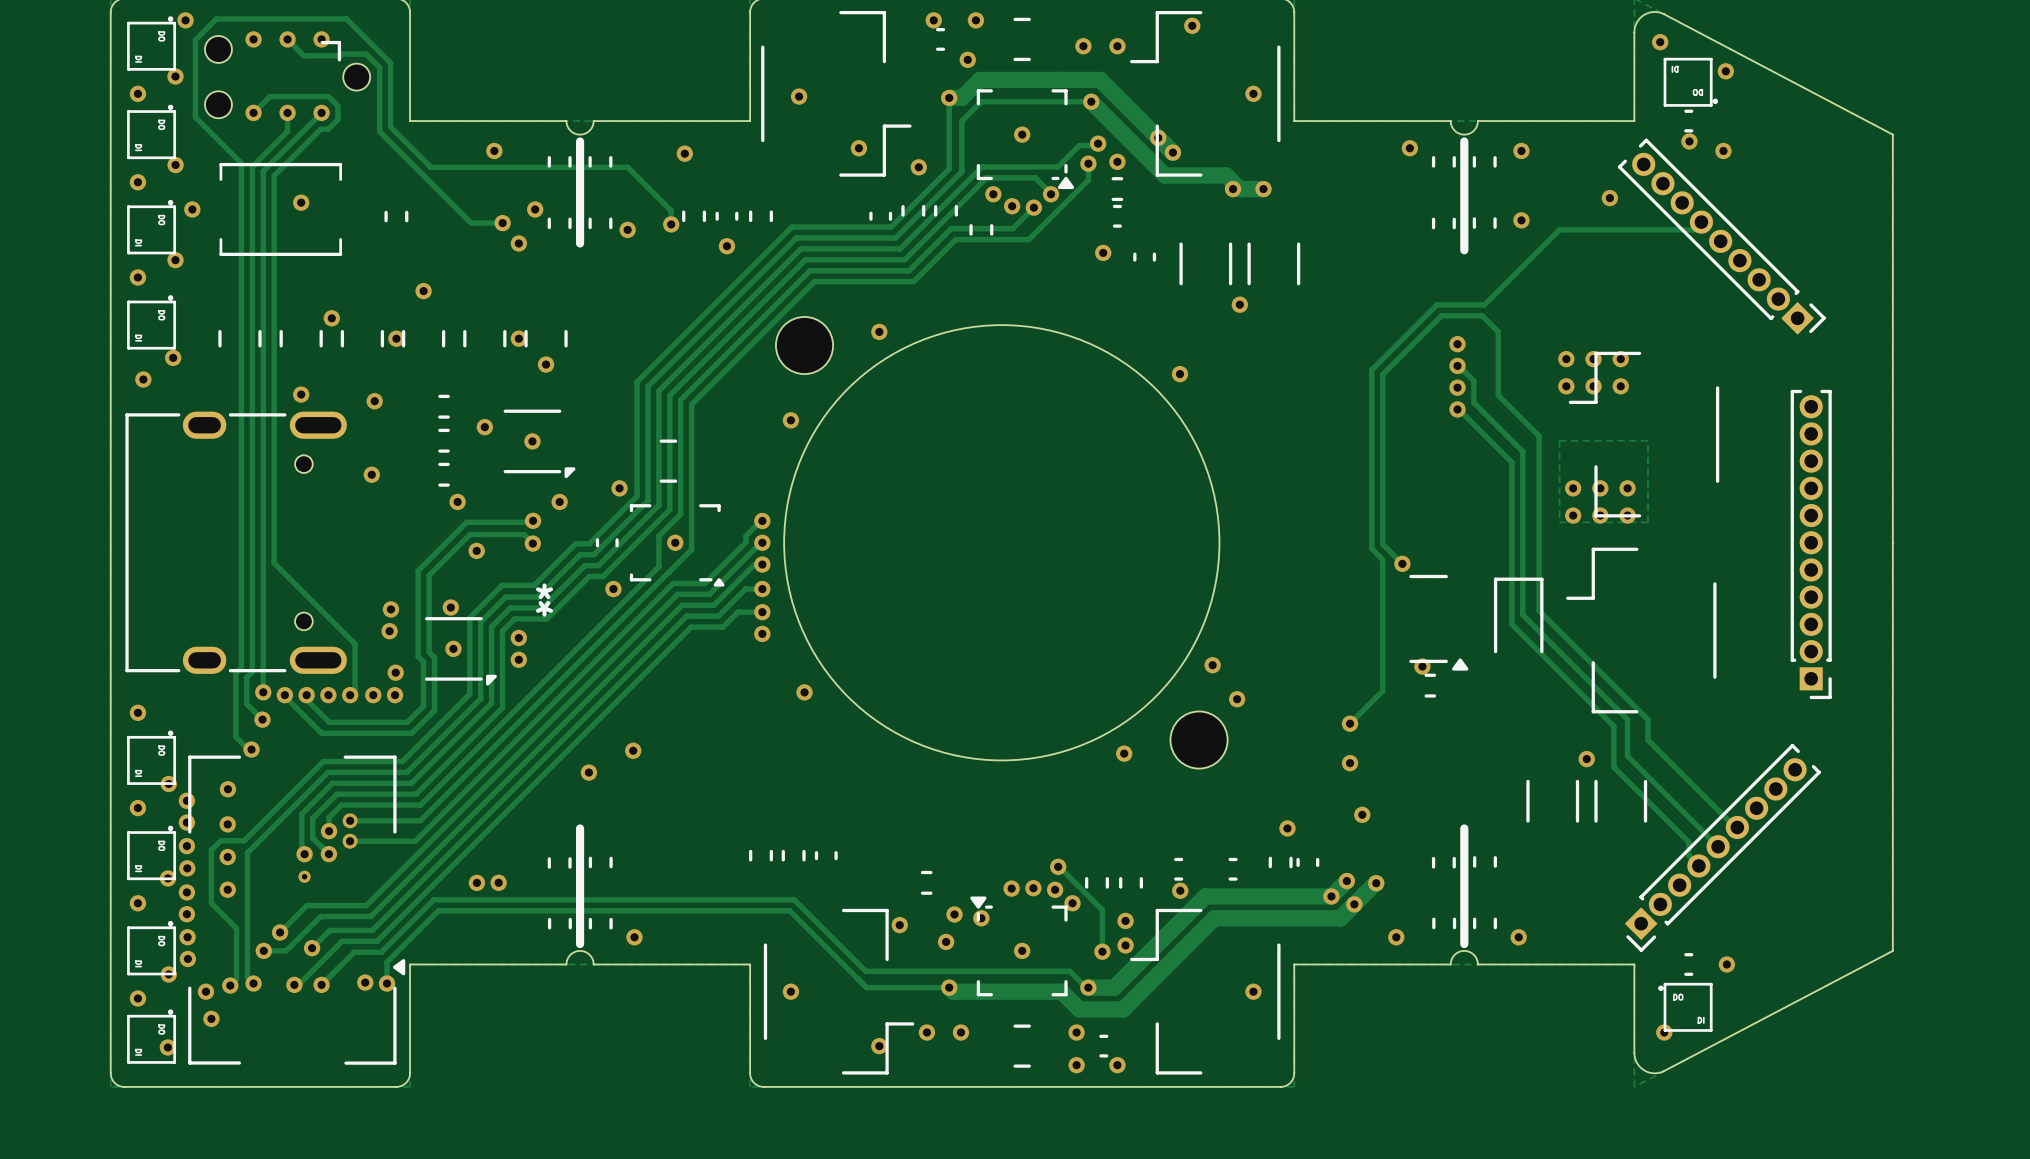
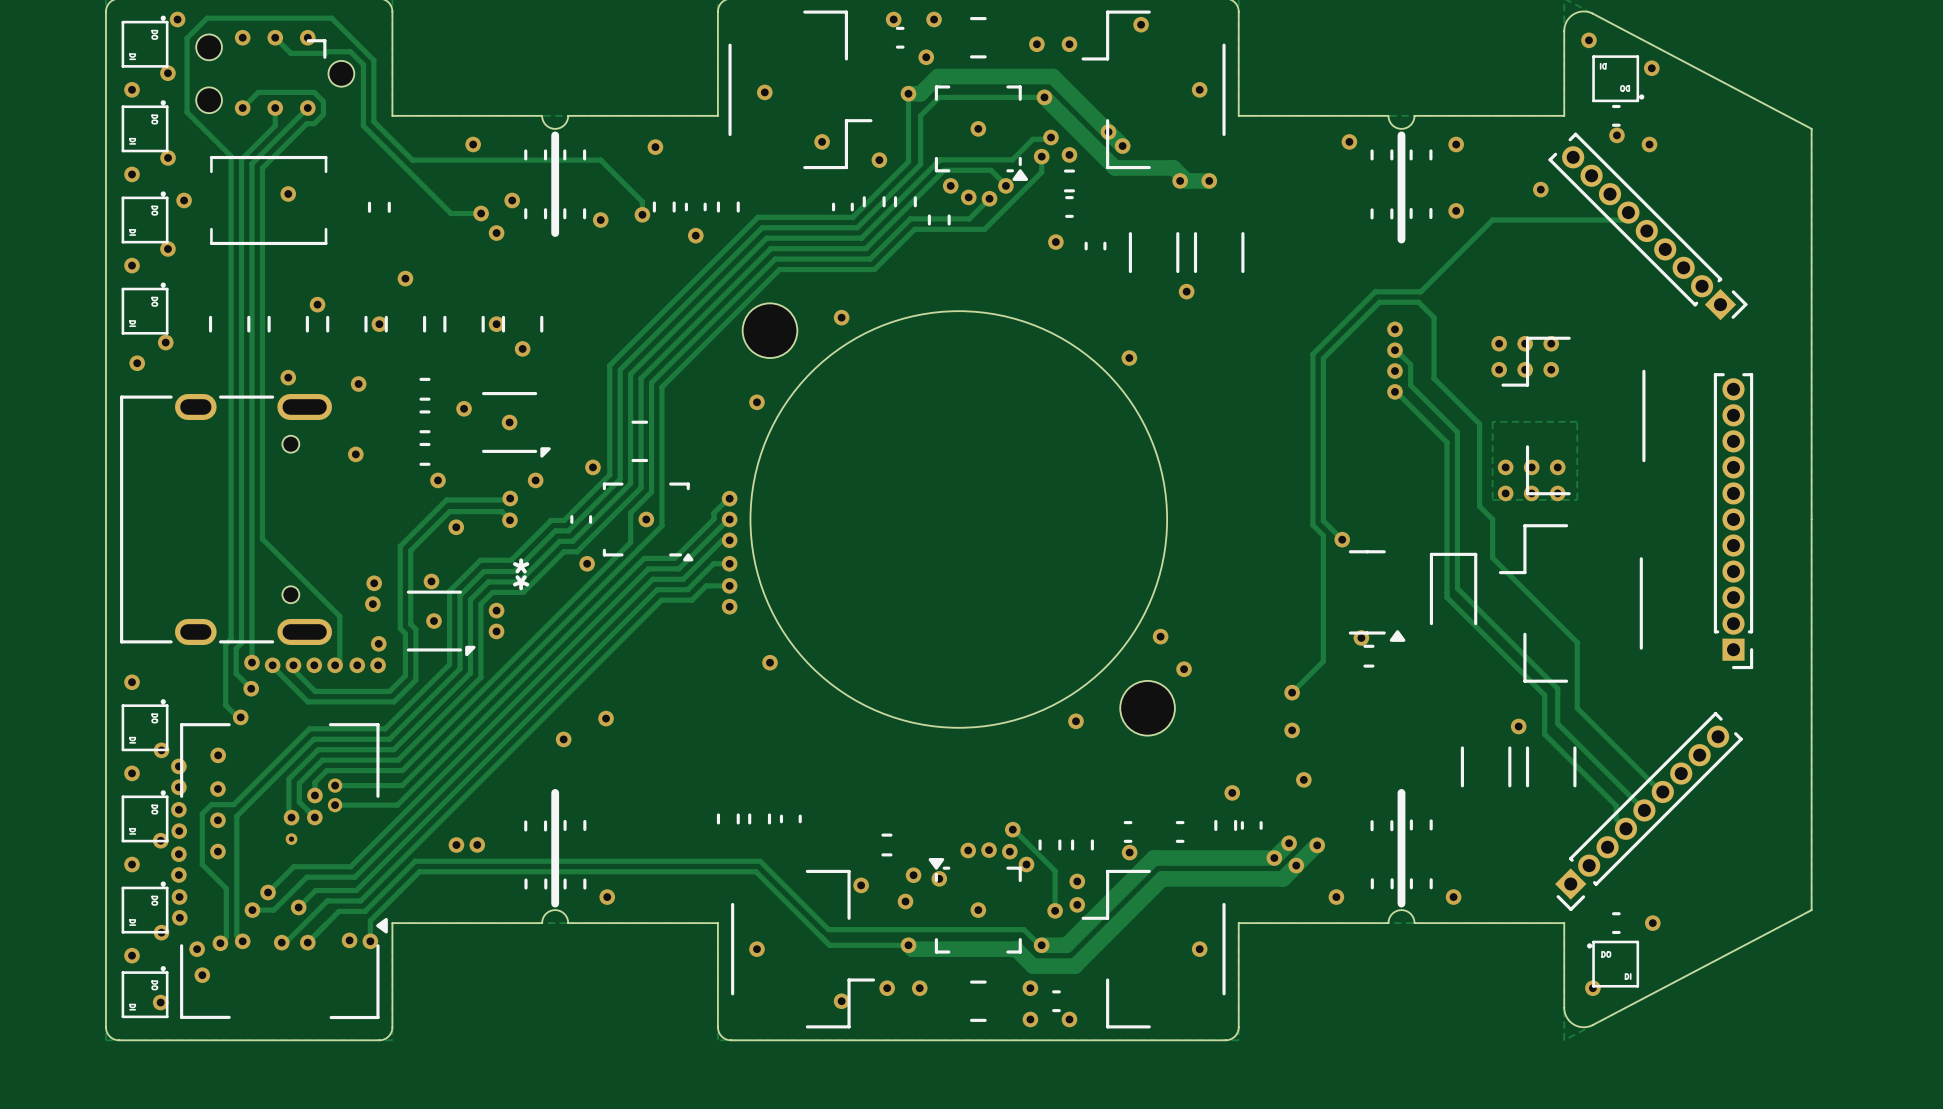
track: (1539, 436) (1539, 610) (1647, 719) -> (1473, 417) (1479, 423) (1479, 506) (1492, 519) (1492, 557) (1577, 642) (1577, 688)

